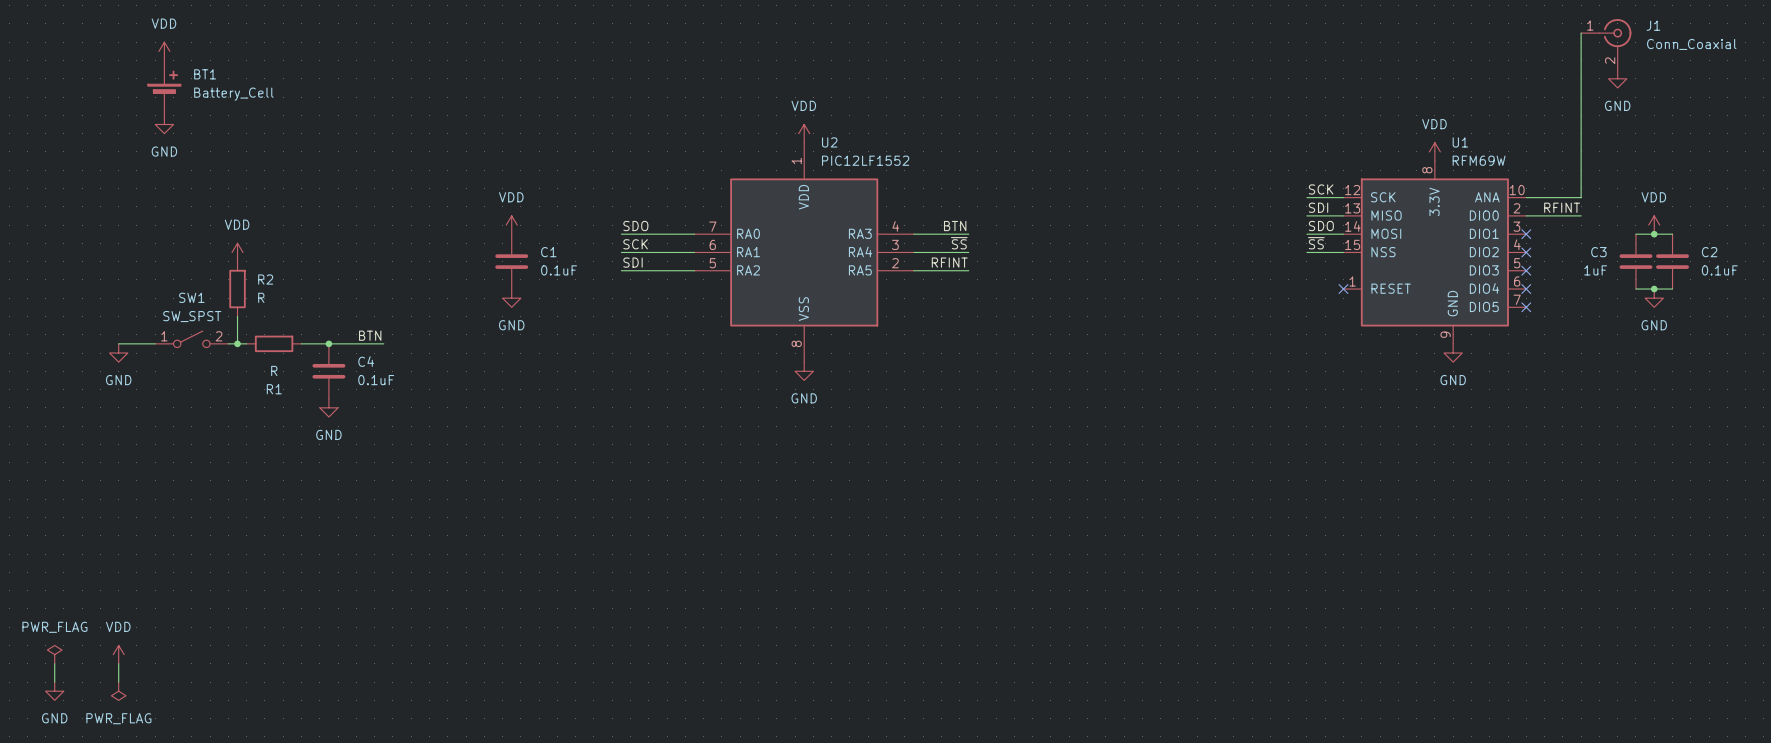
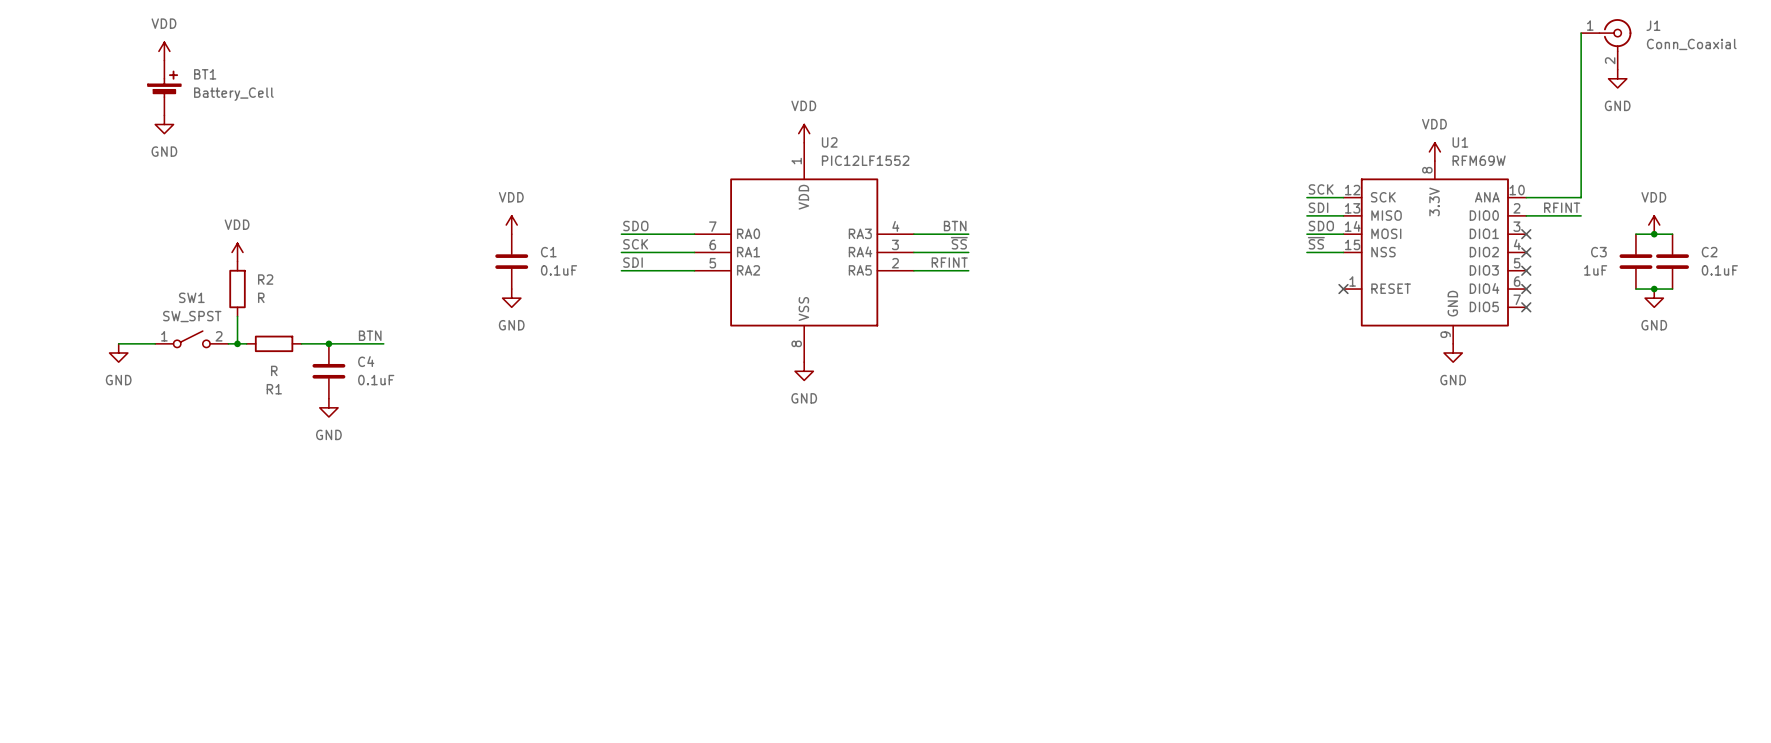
power symbol: PWR_FLAG (54, 654) -> none
power symbol: VDD (118, 654) -> none
wire: (54, 663) (54, 682) -> none
wire: (118, 663) (118, 682) -> none
power symbol: GND (54, 691) -> none
power symbol: PWR_FLAG (118, 691) -> none

